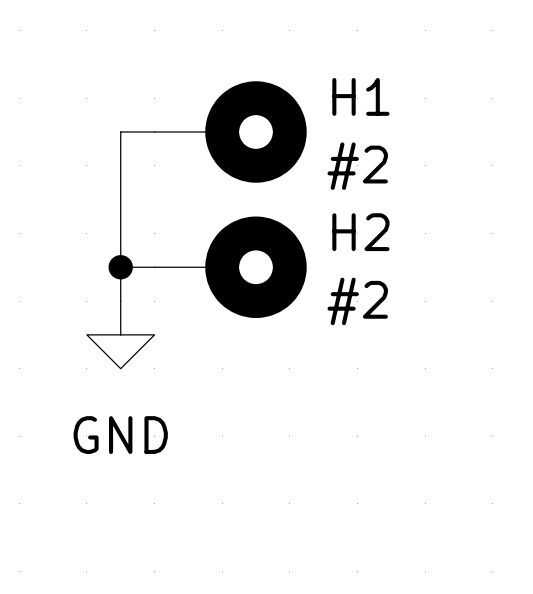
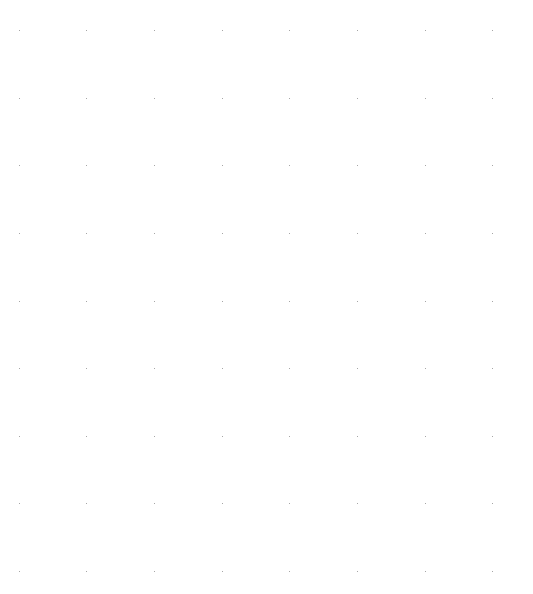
wire: (154, 131) (120, 131) (120, 301) -> none
H1: #2 (230, 131) -> none
wire: (120, 267) (154, 267) -> none
junction: (120, 267) -> none
H2: #2 (230, 267) -> none
power symbol: GND (120, 334) -> none

